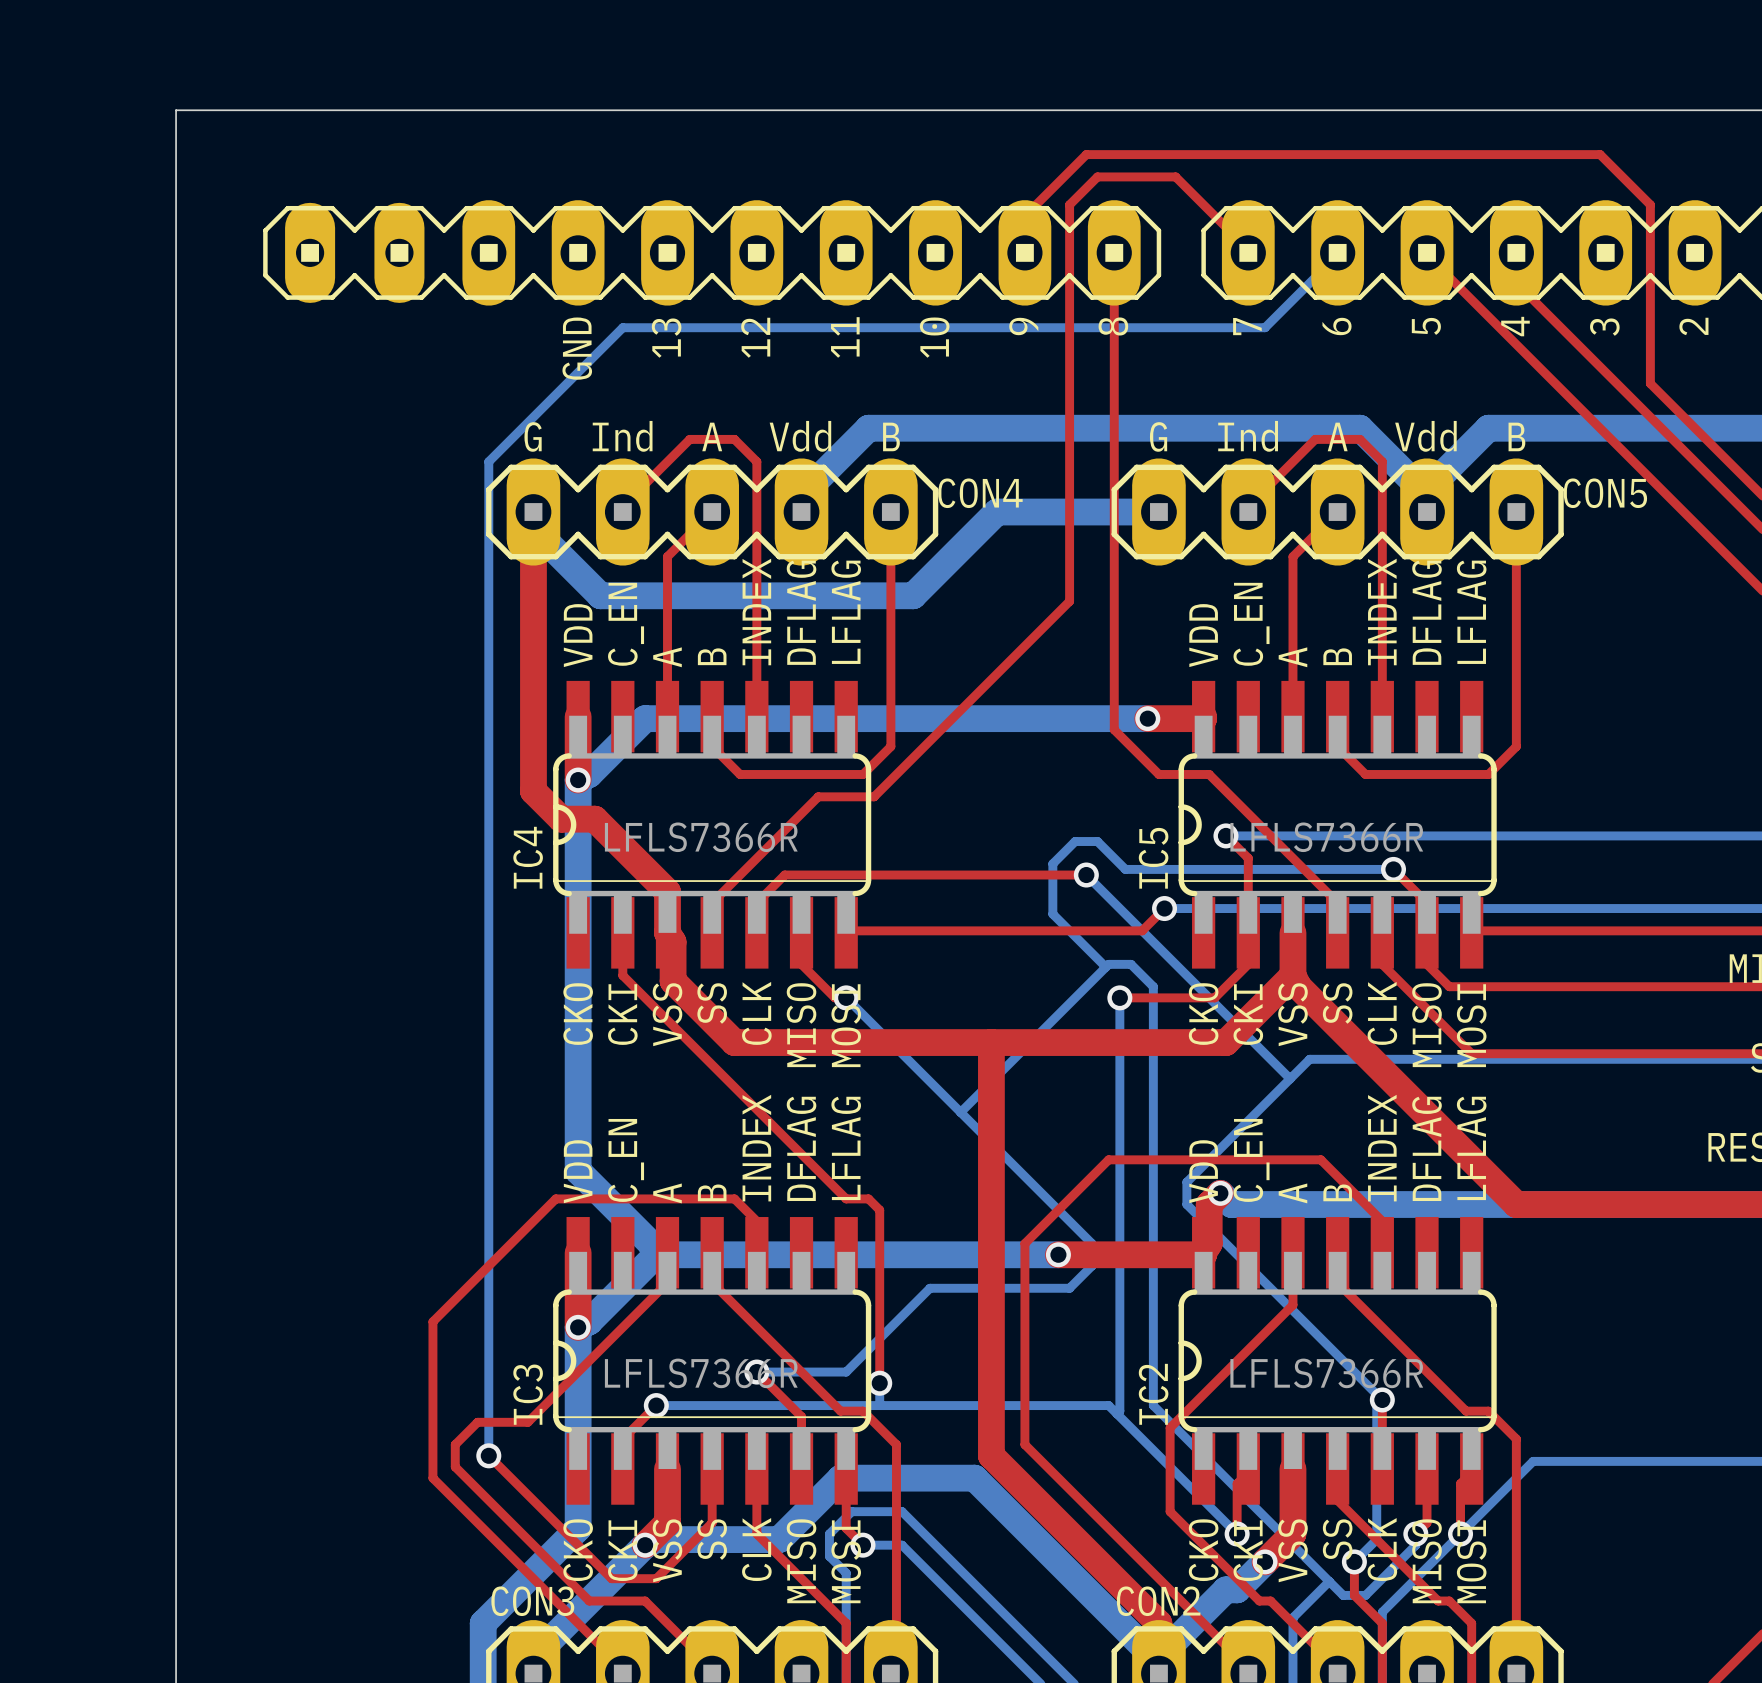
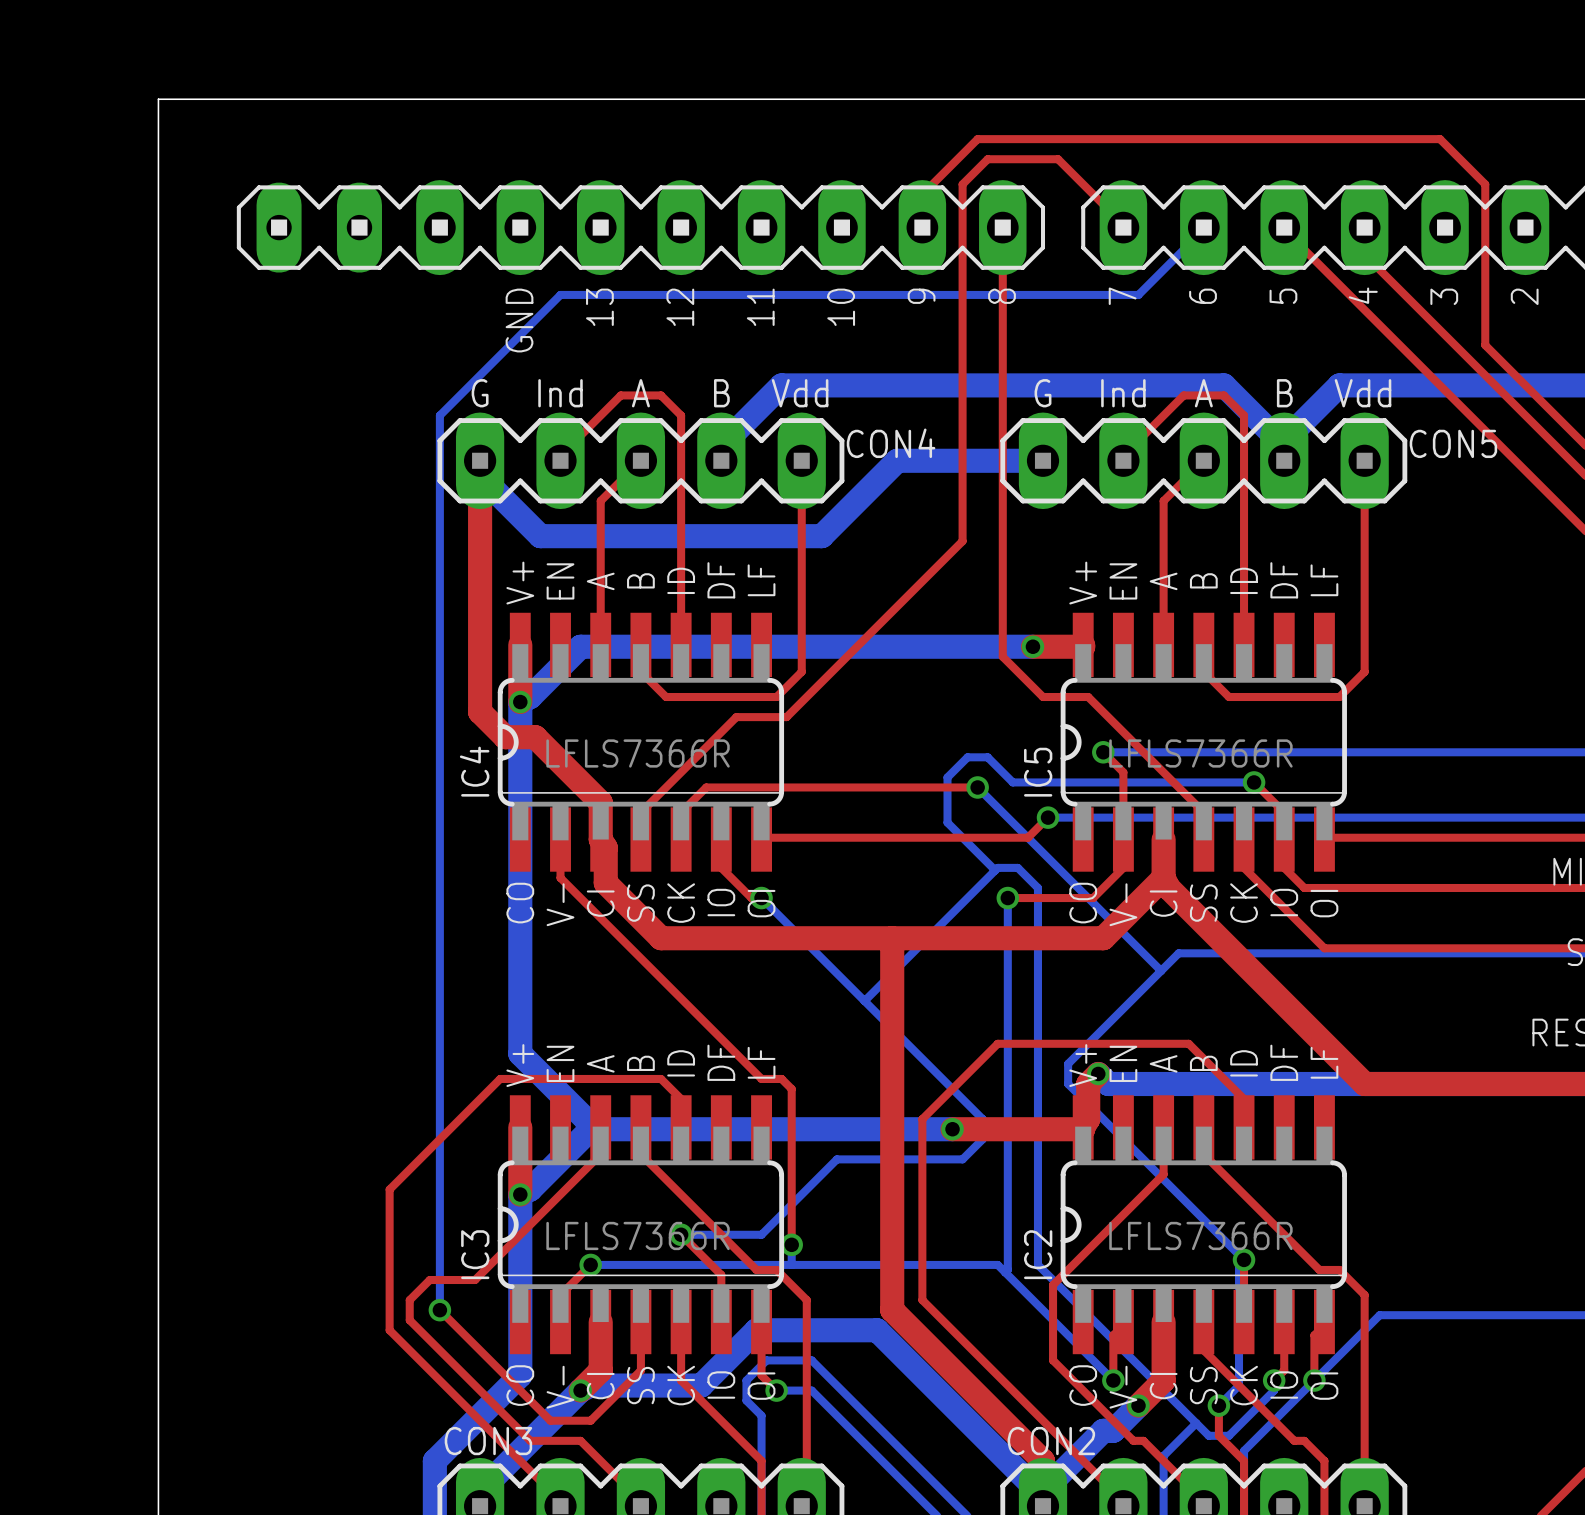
CON4 text: Vdd (800, 436) -> B (721, 393)
CON4 text: B (891, 436) -> Vdd (800, 393)
CON5 text: Vdd (1425, 436) -> B (1284, 393)
CON5 text: B (1516, 436) -> Vdd (1363, 393)
IC4 footprint: [553, 680, 872, 969] -> [497, 612, 785, 872]
IC5 footprint: [1178, 680, 1497, 969] -> [1060, 612, 1347, 872]
IC3 footprint: [553, 1217, 872, 1505] -> [497, 1095, 785, 1355]
IC2 footprint: [1178, 1217, 1497, 1505] -> [1060, 1095, 1347, 1355]

